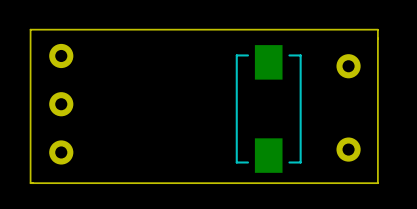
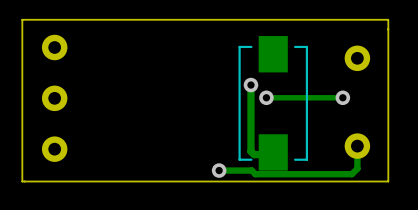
track: none -> (250, 85) (250, 151) (254, 154) (271, 154) (273, 152)
via: none -> (250, 85)
via: none -> (266, 97)
track: none -> (342, 97) (266, 97)
via: none -> (342, 97)
track: none -> (357, 146) (357, 168) (351, 174) (255, 174) (251, 170) (219, 170)
via: none -> (219, 170)

